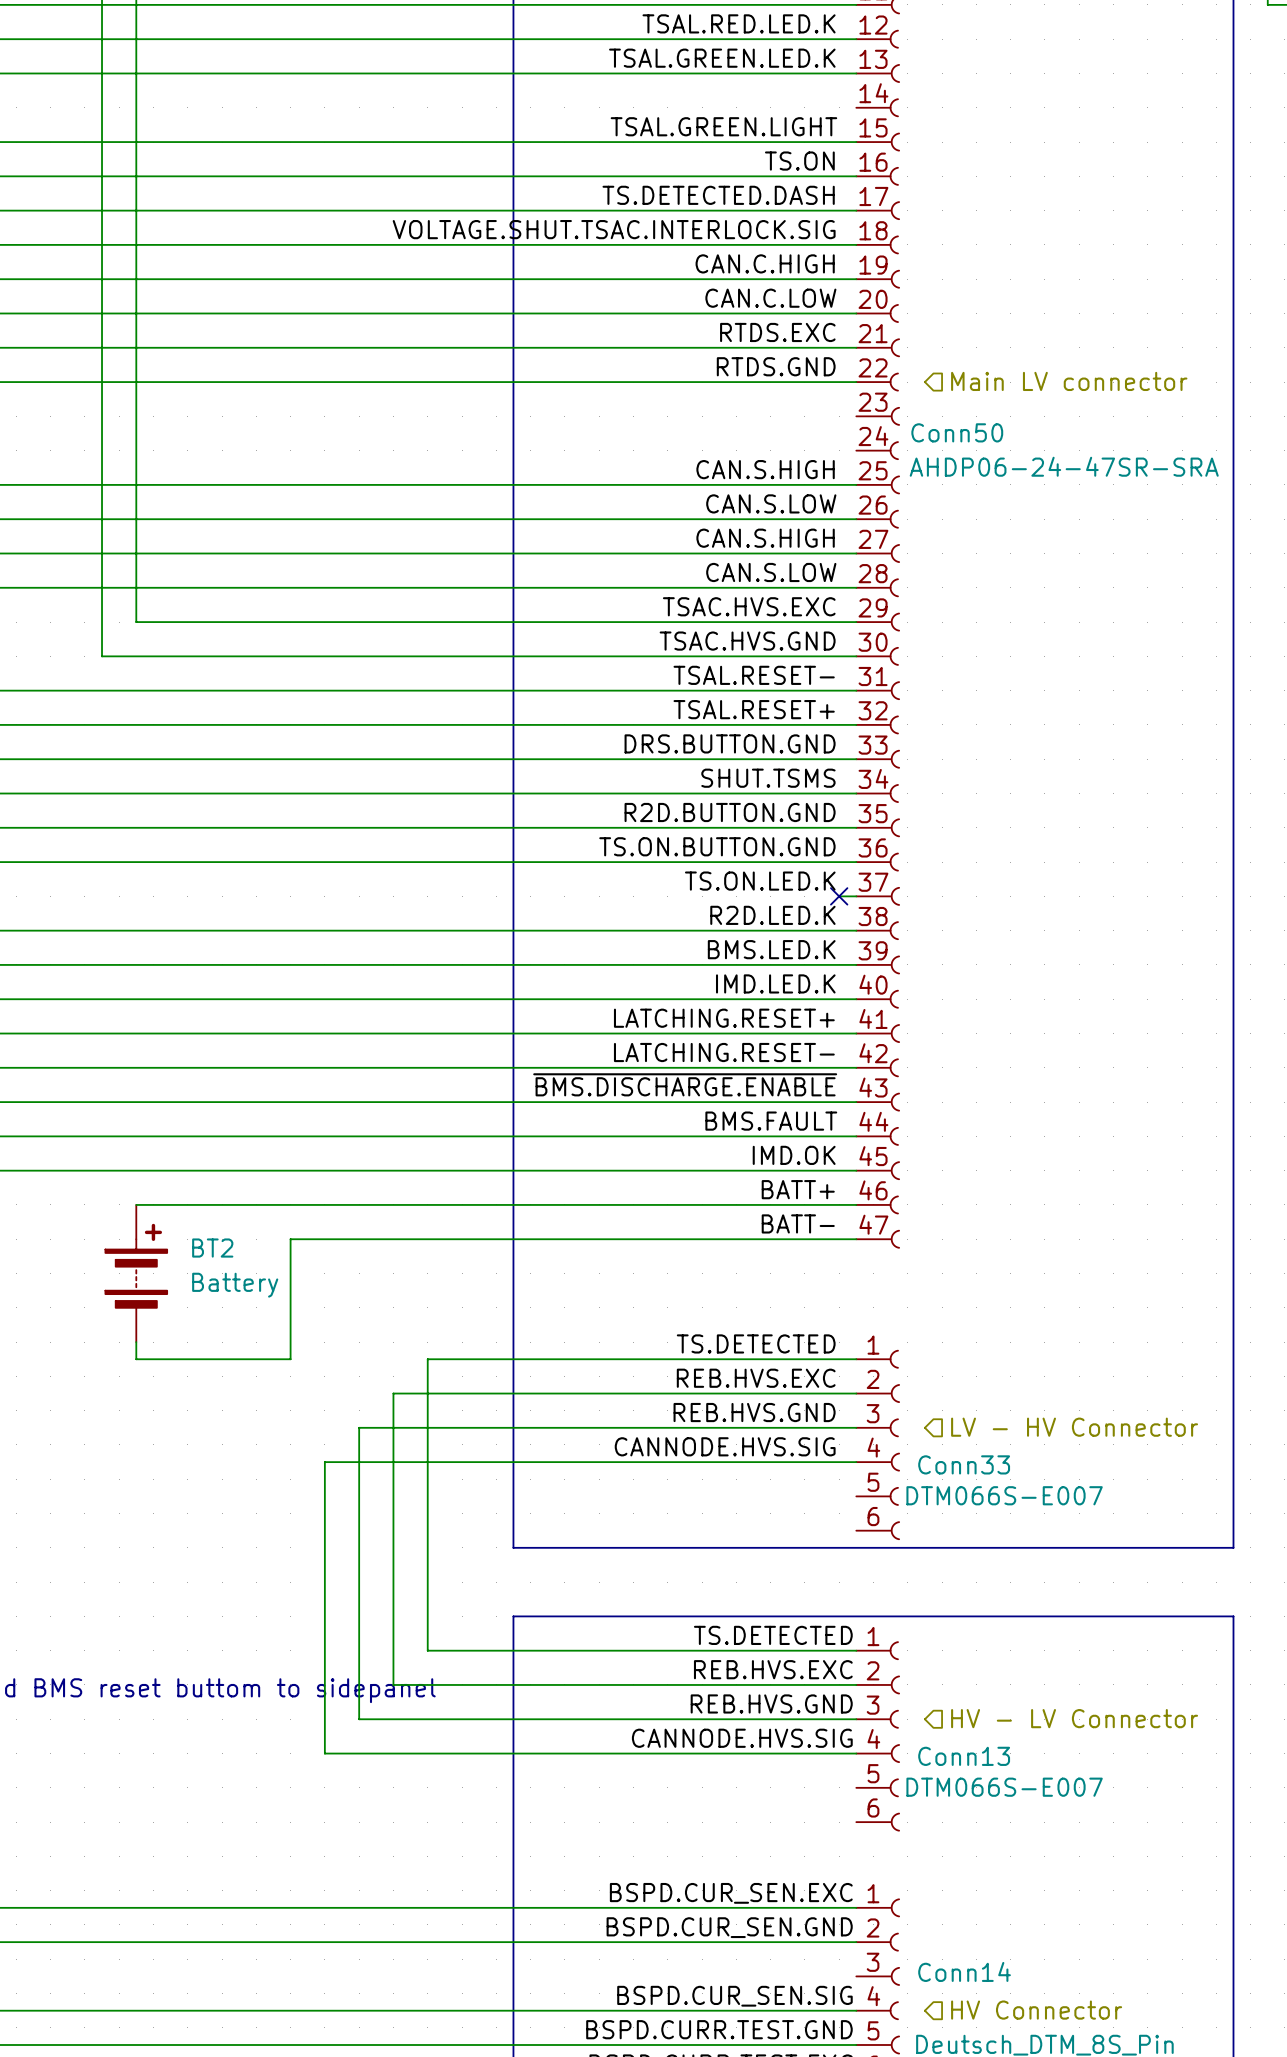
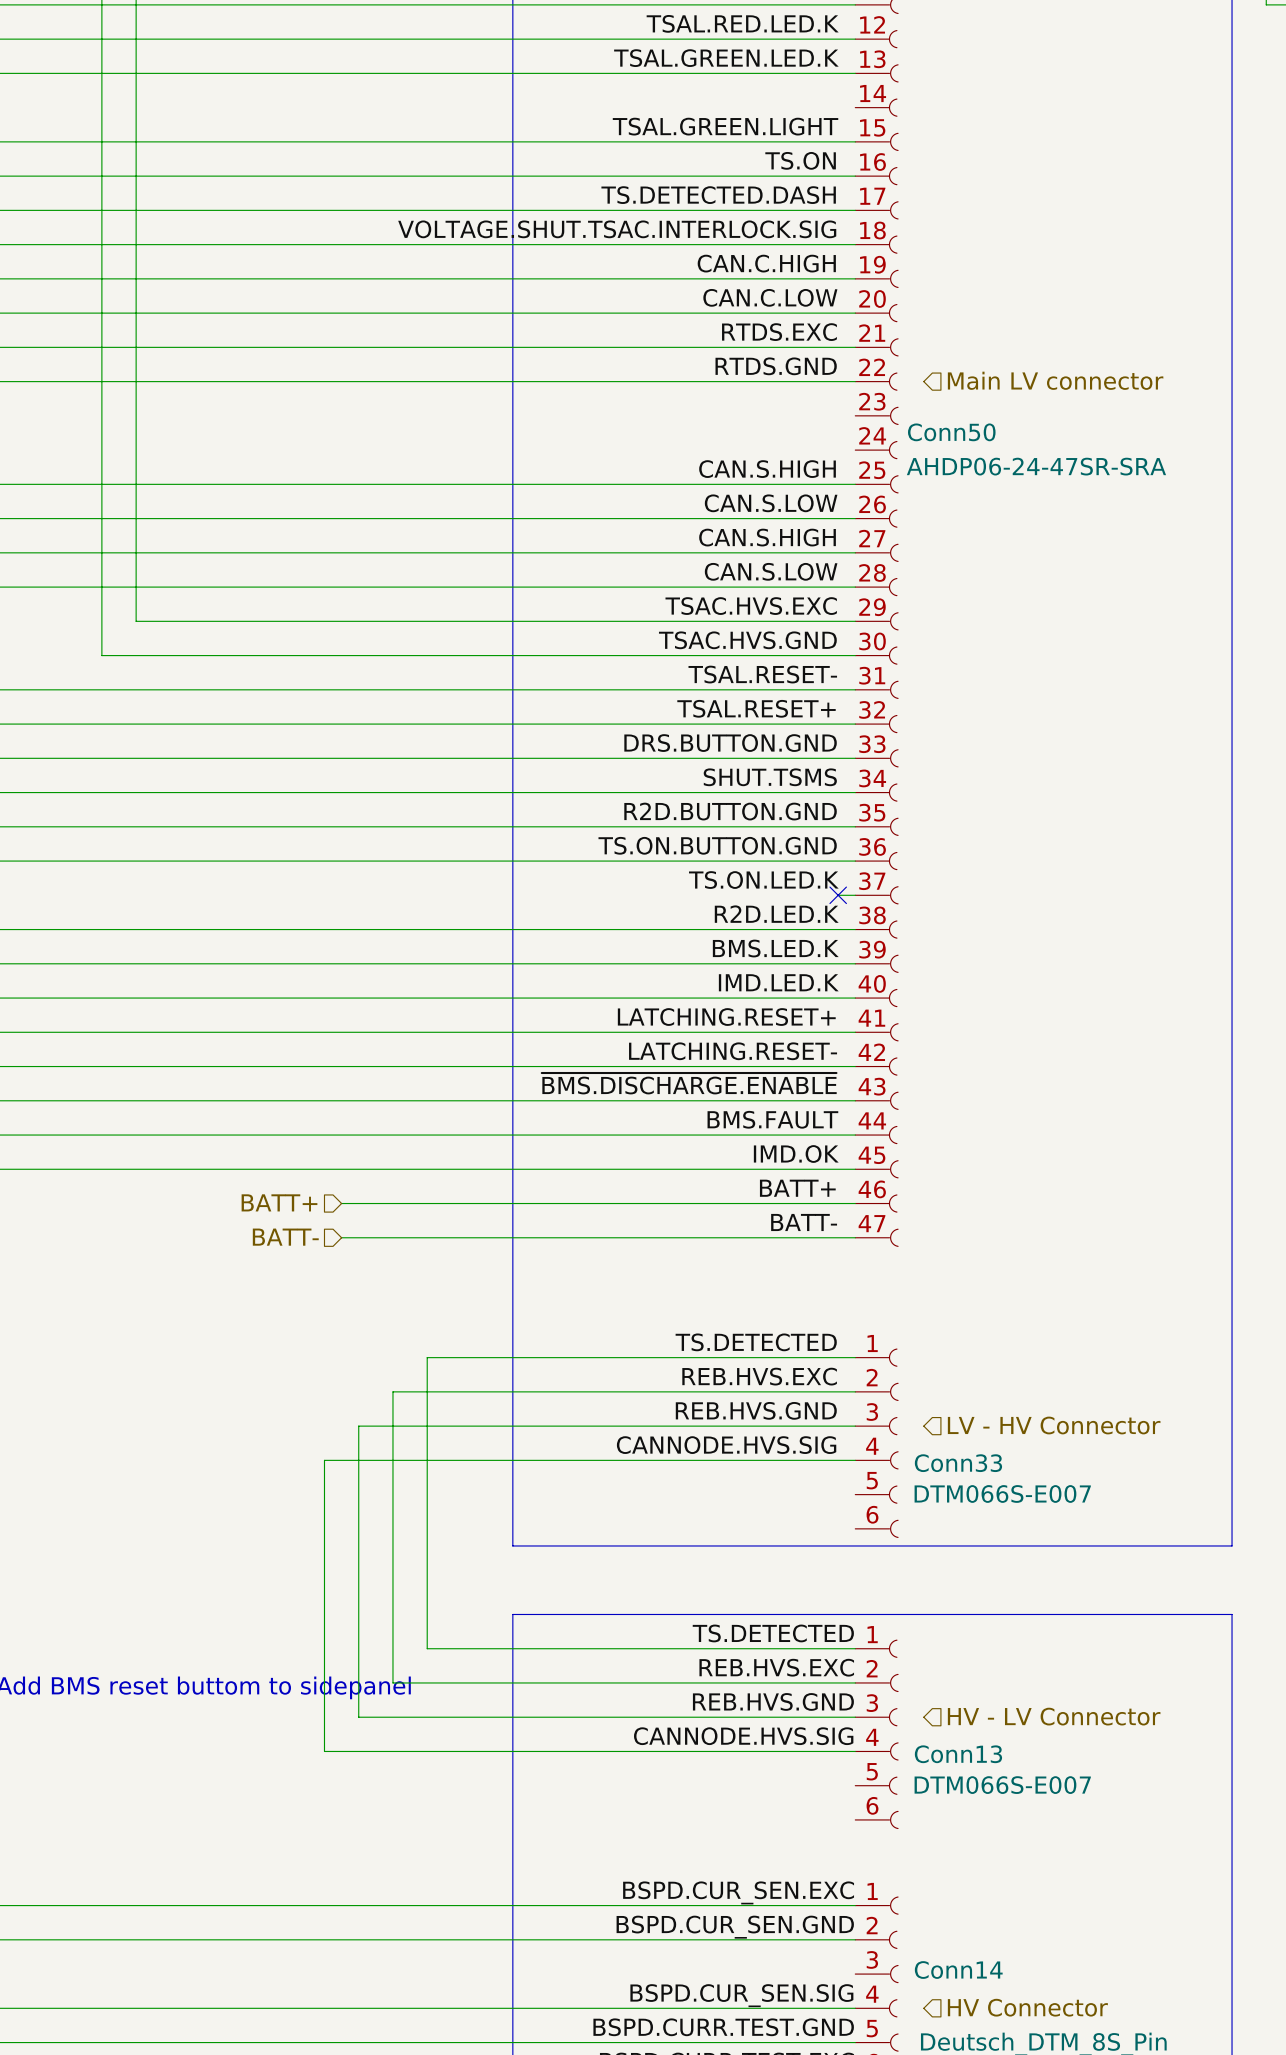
wire: (136, 1204) (342, 1204) -> none
hierarchical label: none -> BATT+ (279, 1202)
hierarchical label: none -> BATT- (285, 1237)
wire: (342, 1239) (290, 1239) (290, 1359) (136, 1359) (136, 1342) -> none
BT2: Battery (136, 1273) -> none

